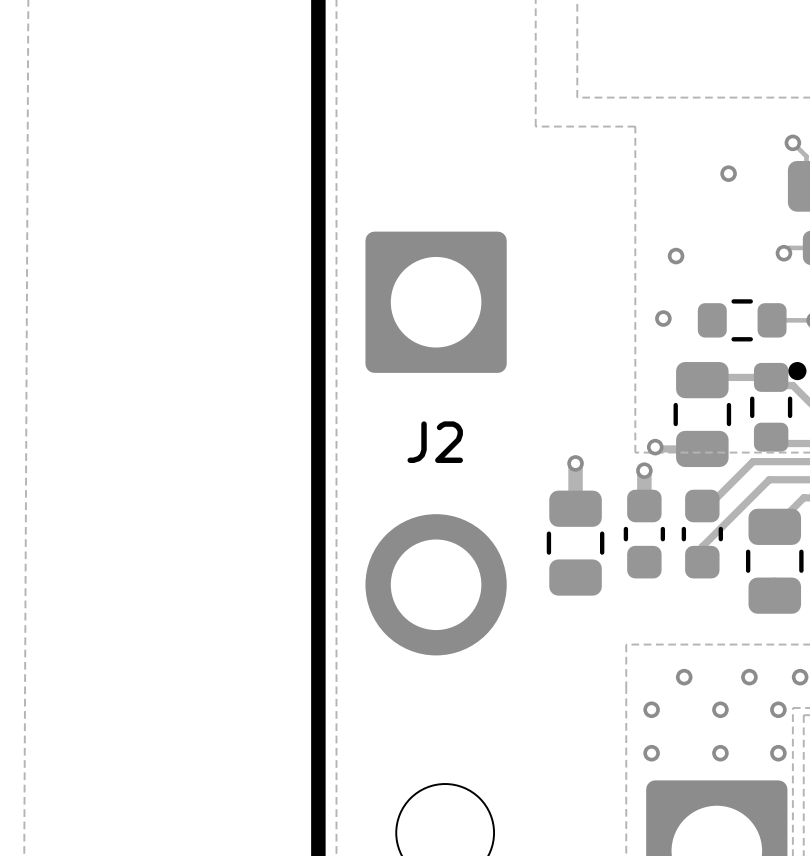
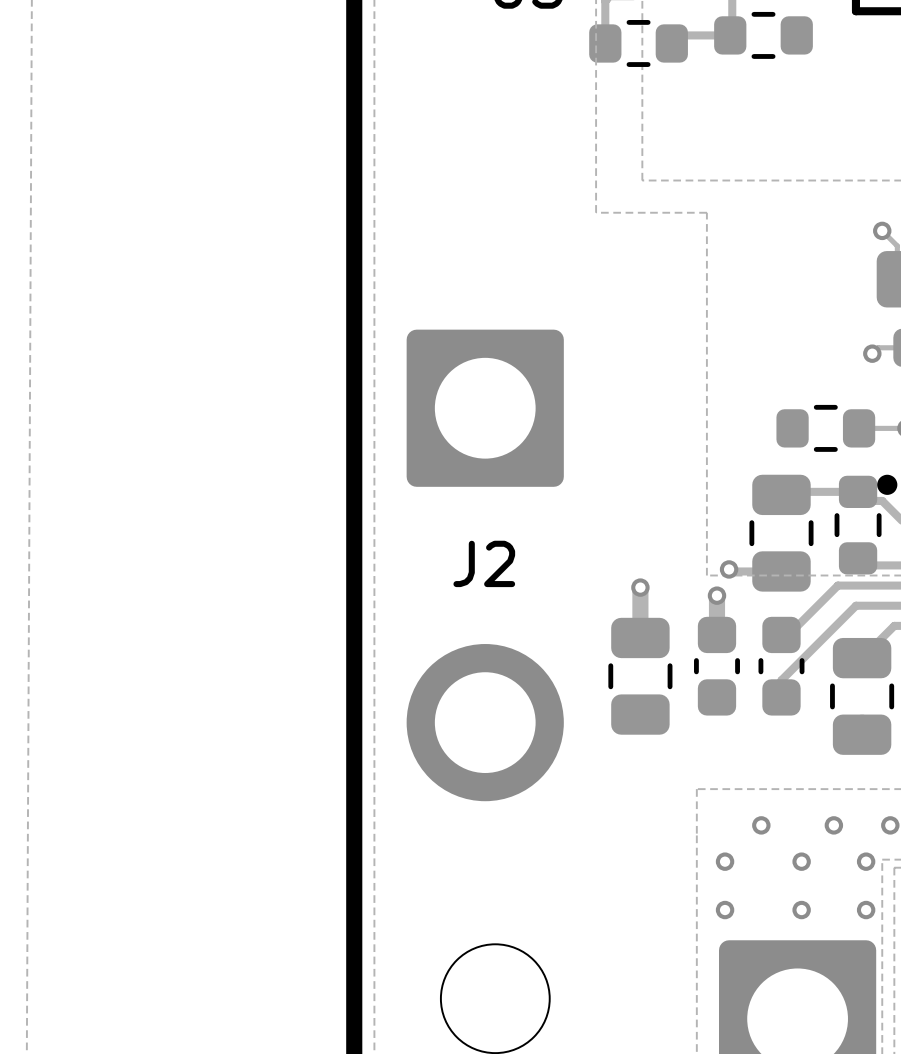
via: (728, 173) -> none
via: (676, 256) -> none
via: (663, 318) -> none

